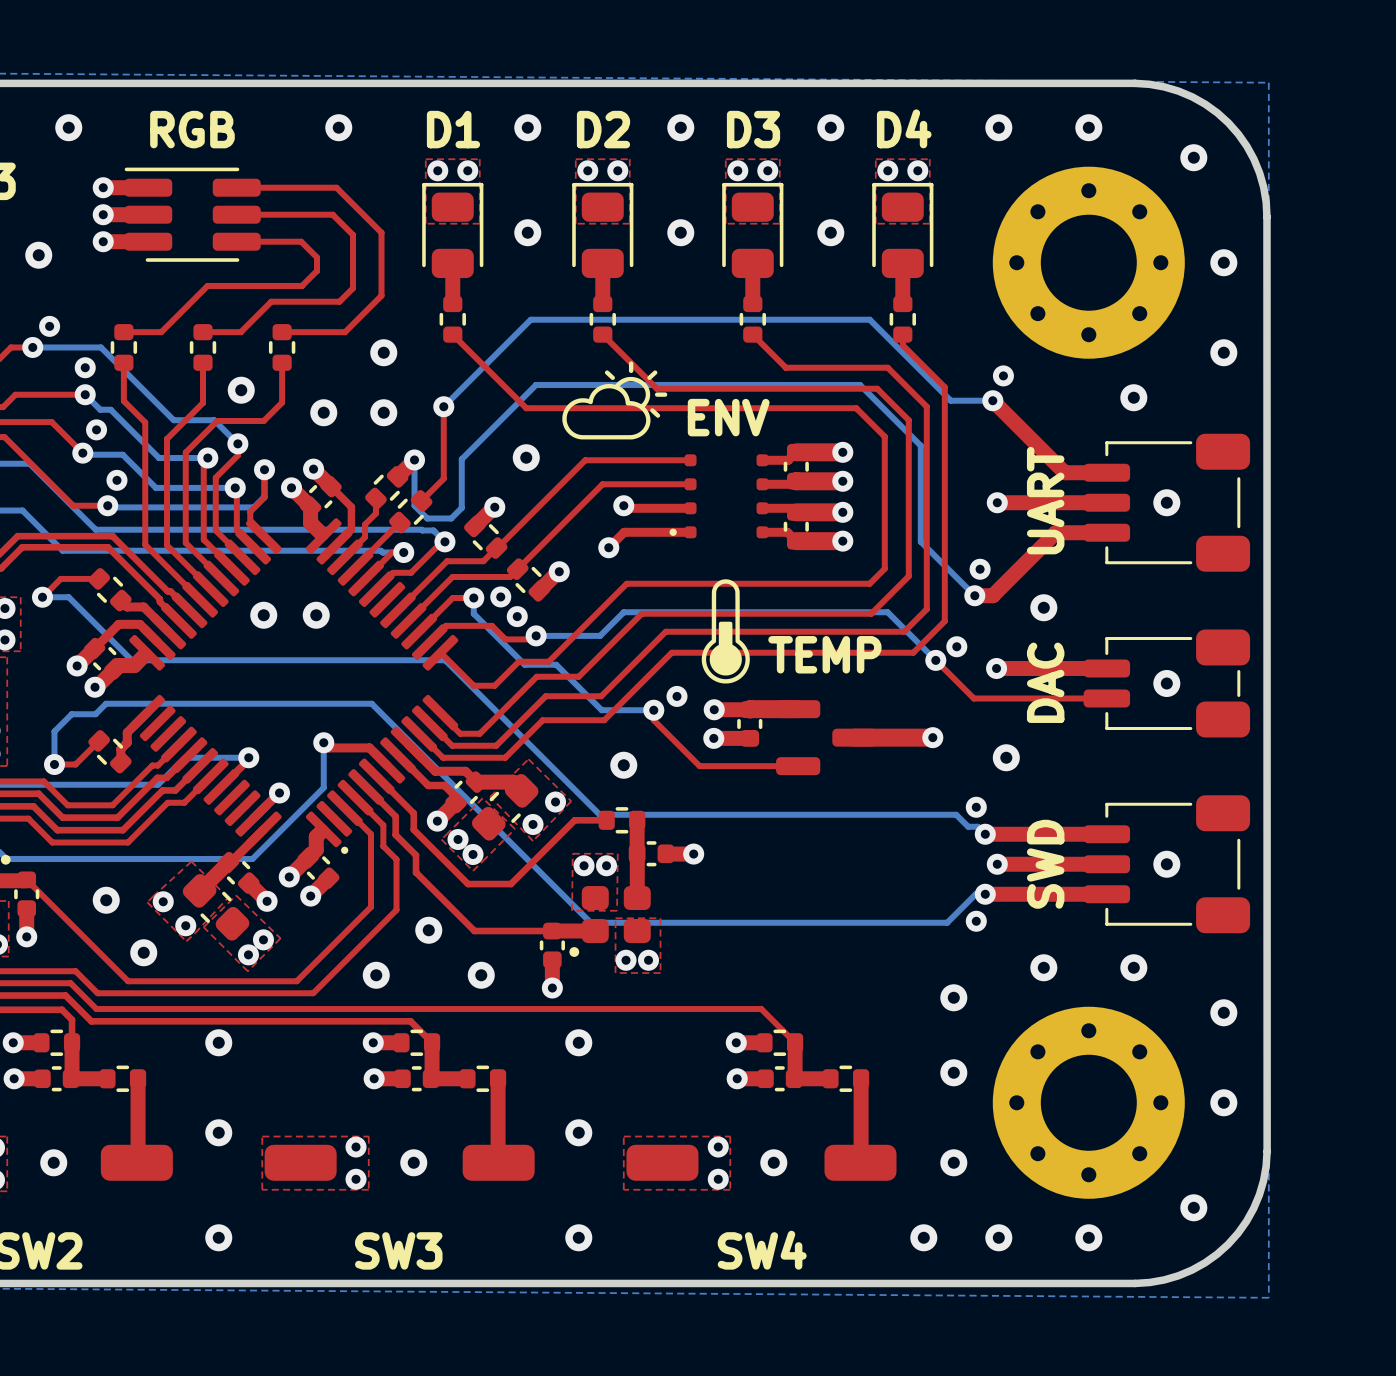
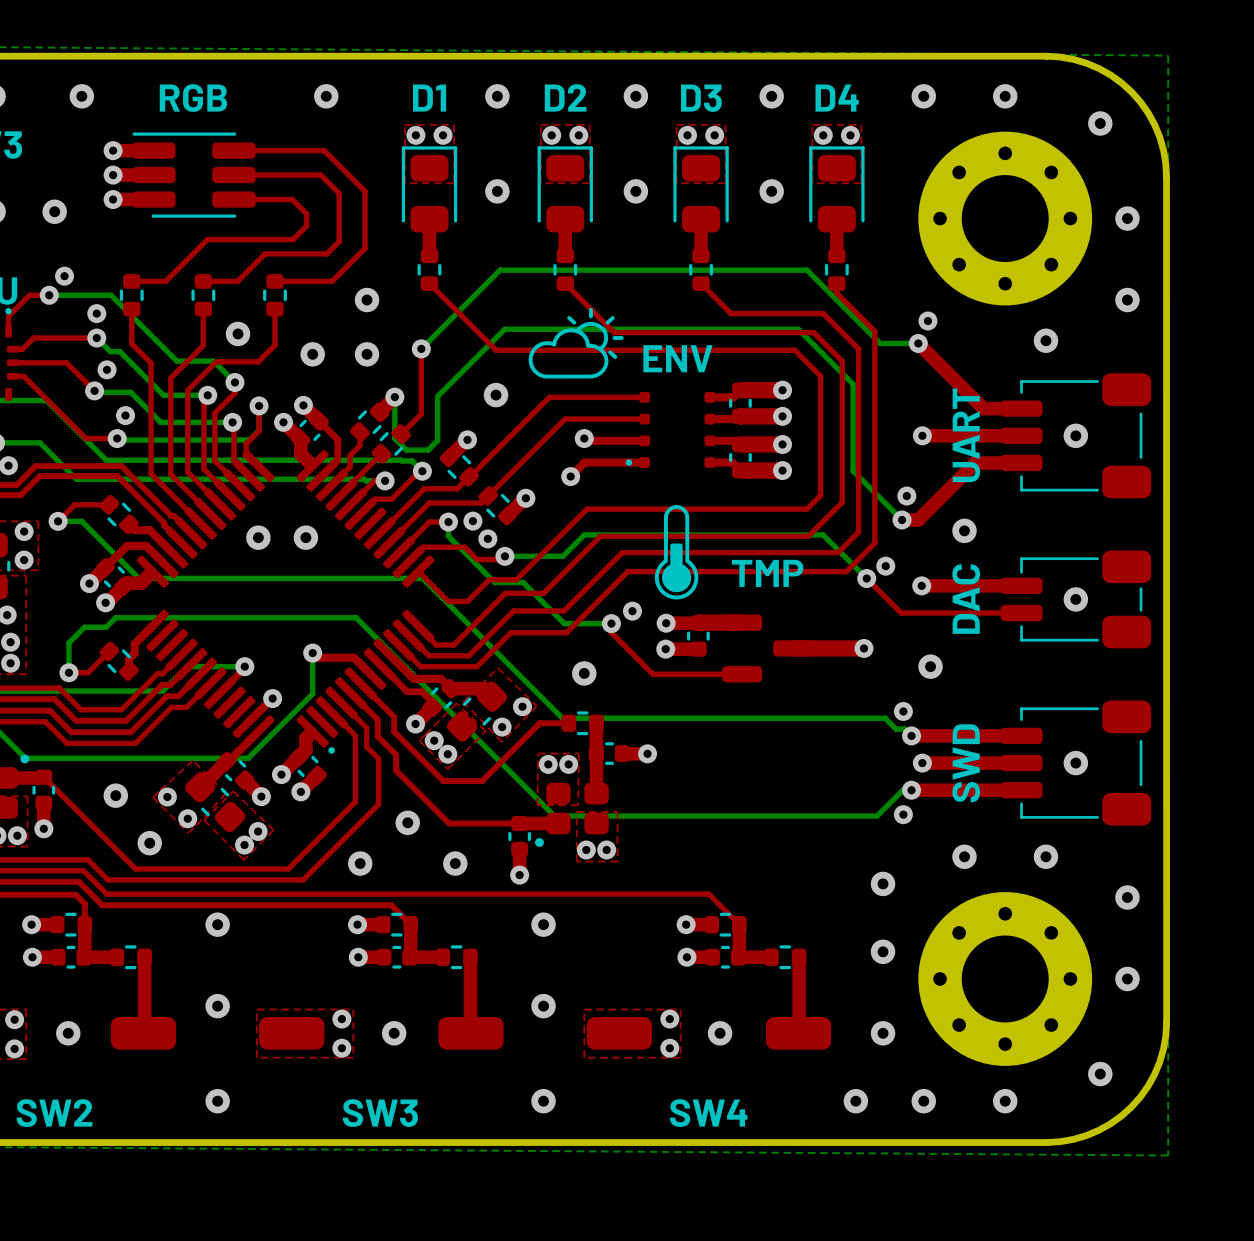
text: TEMP (824, 654) -> TMP (767, 573)

